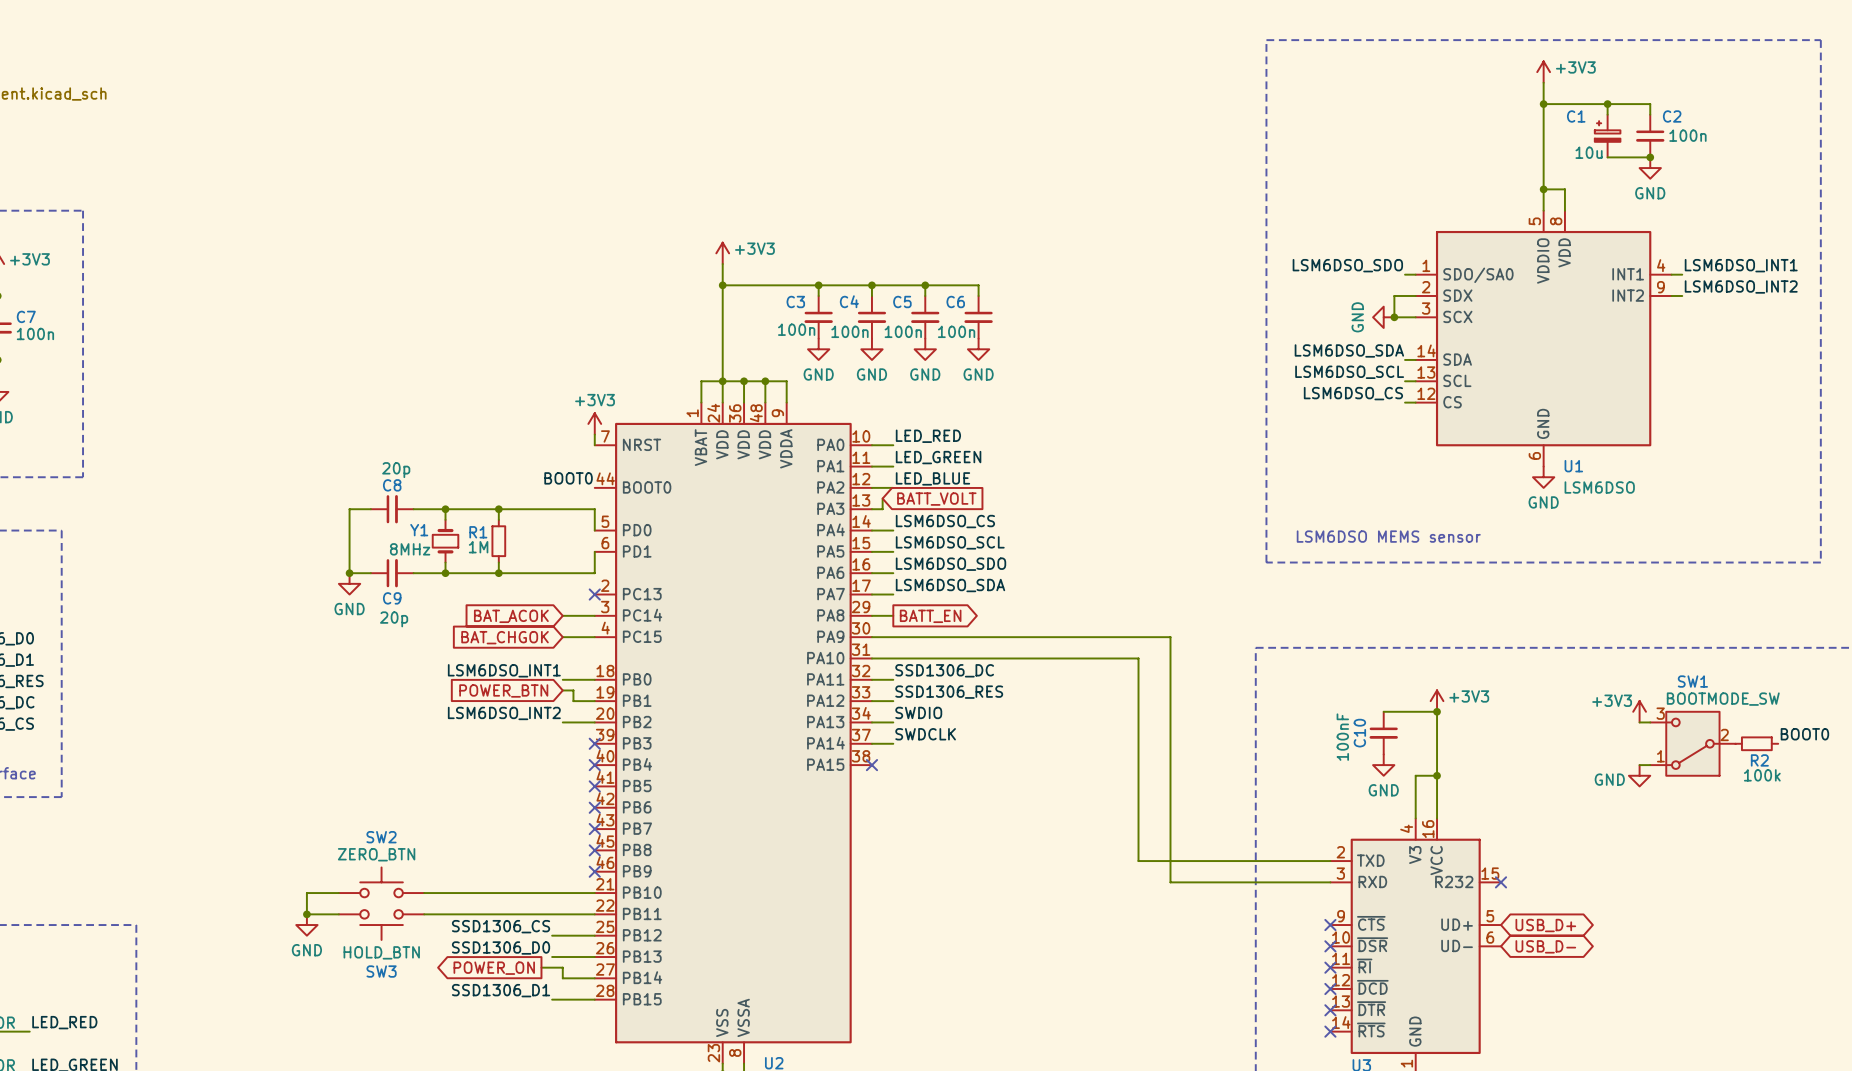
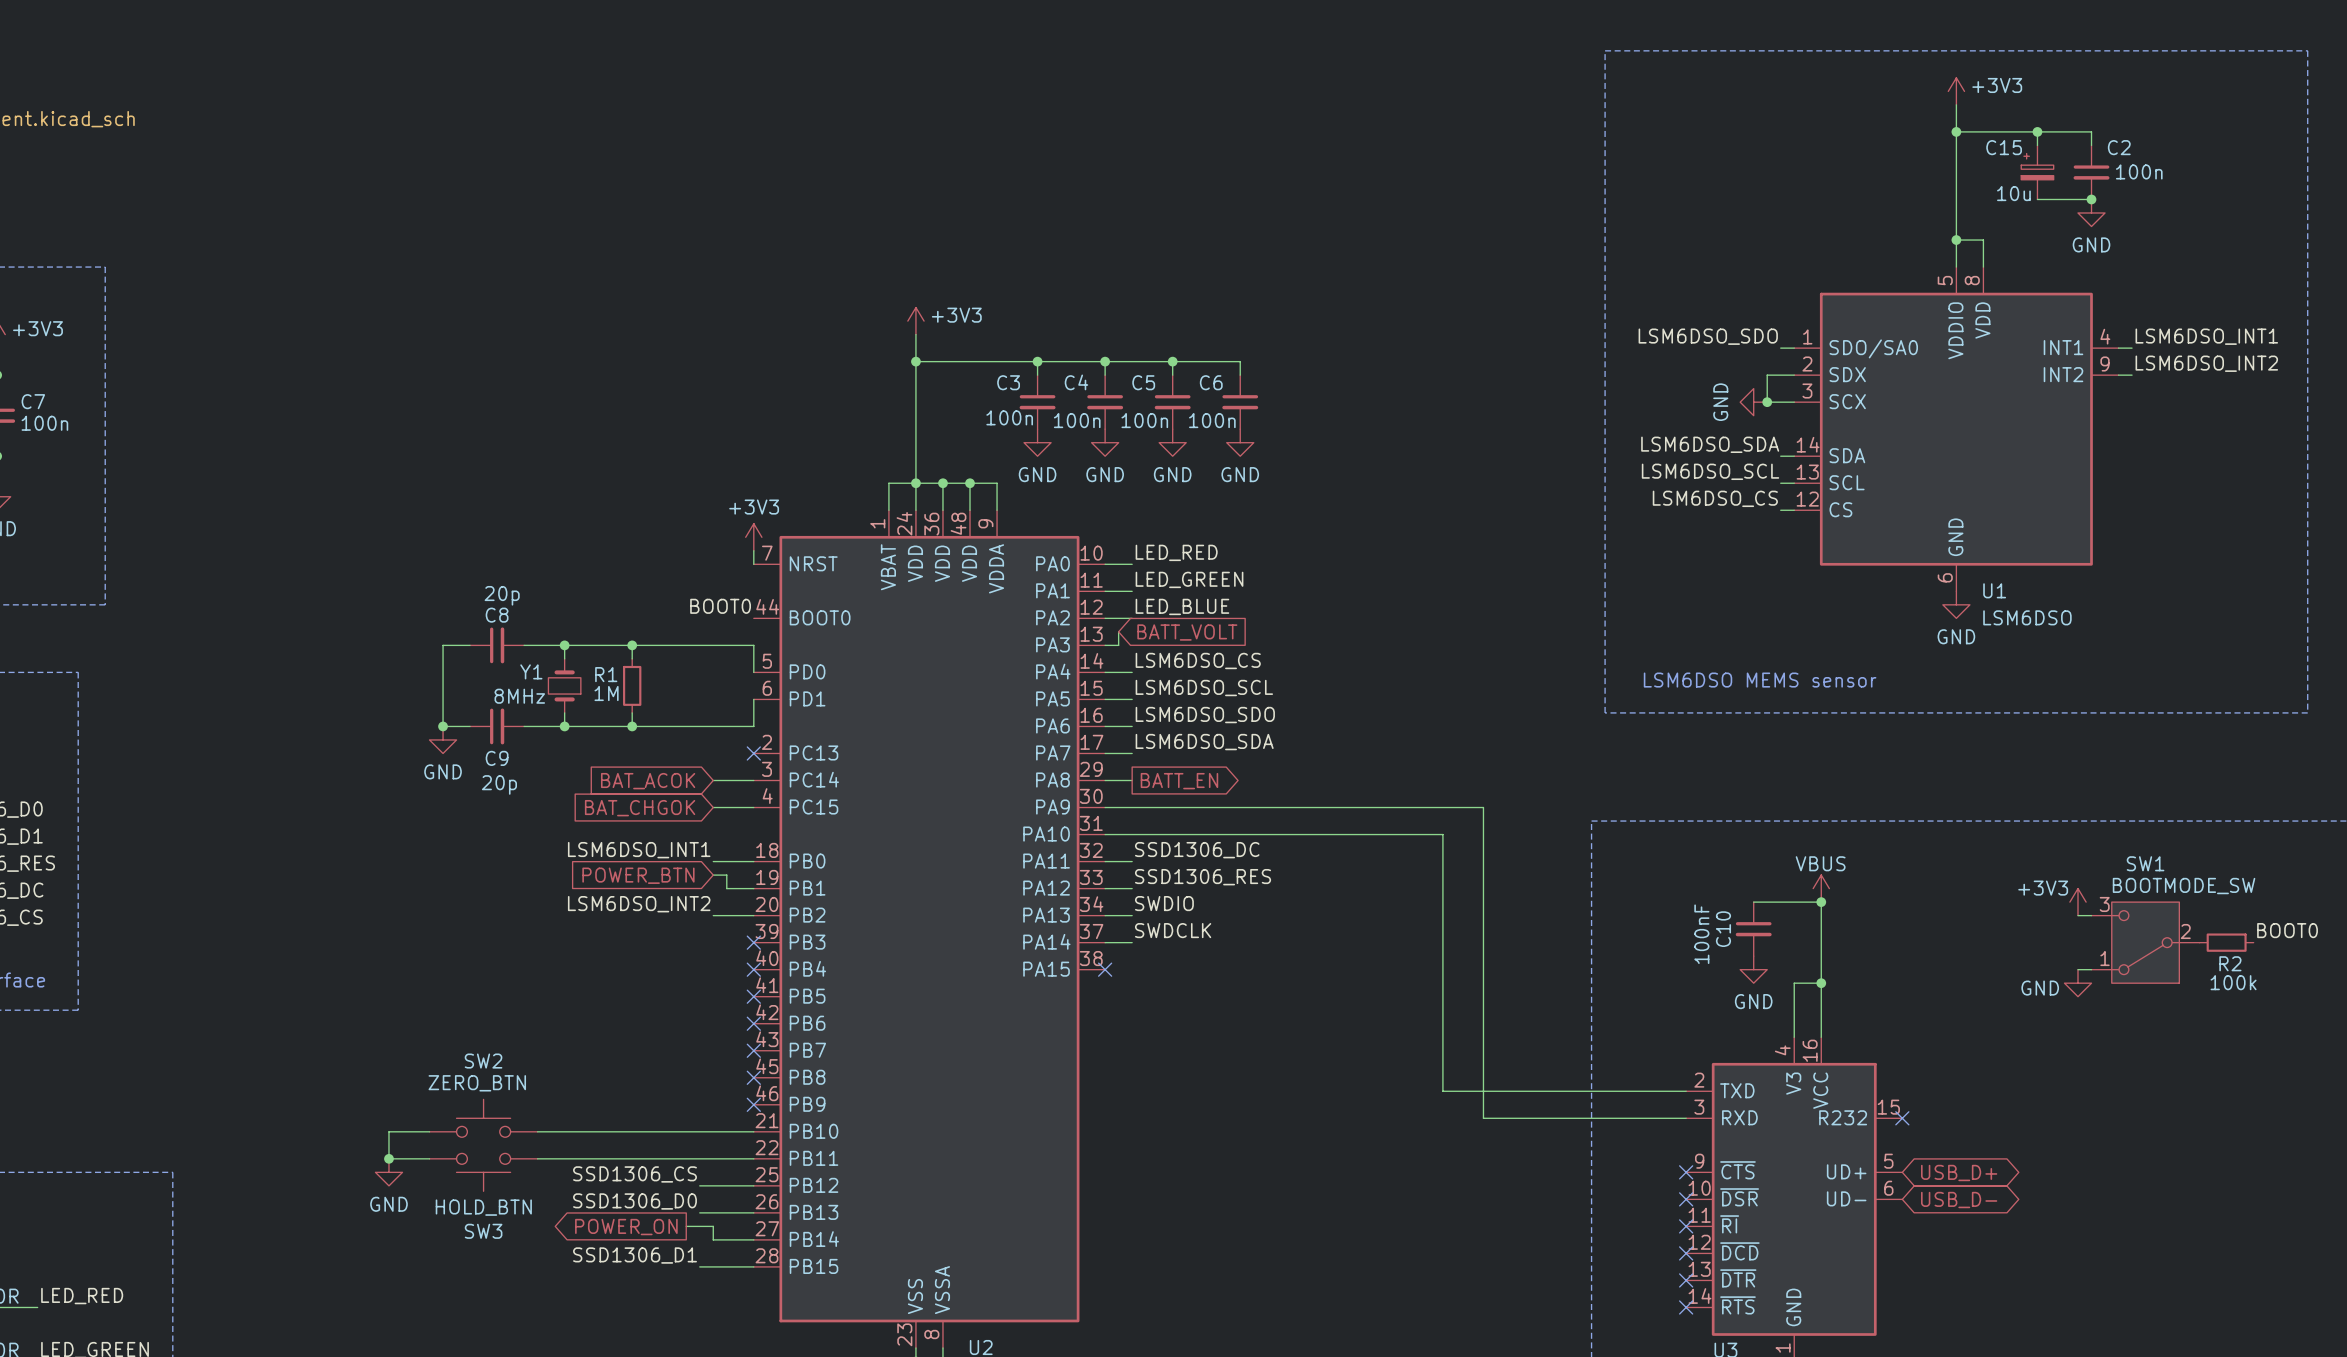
C1 name: C1 (1576, 116) -> C15 (2004, 147)
power symbol: +3V3 (1437, 701) -> VBUS (1821, 888)

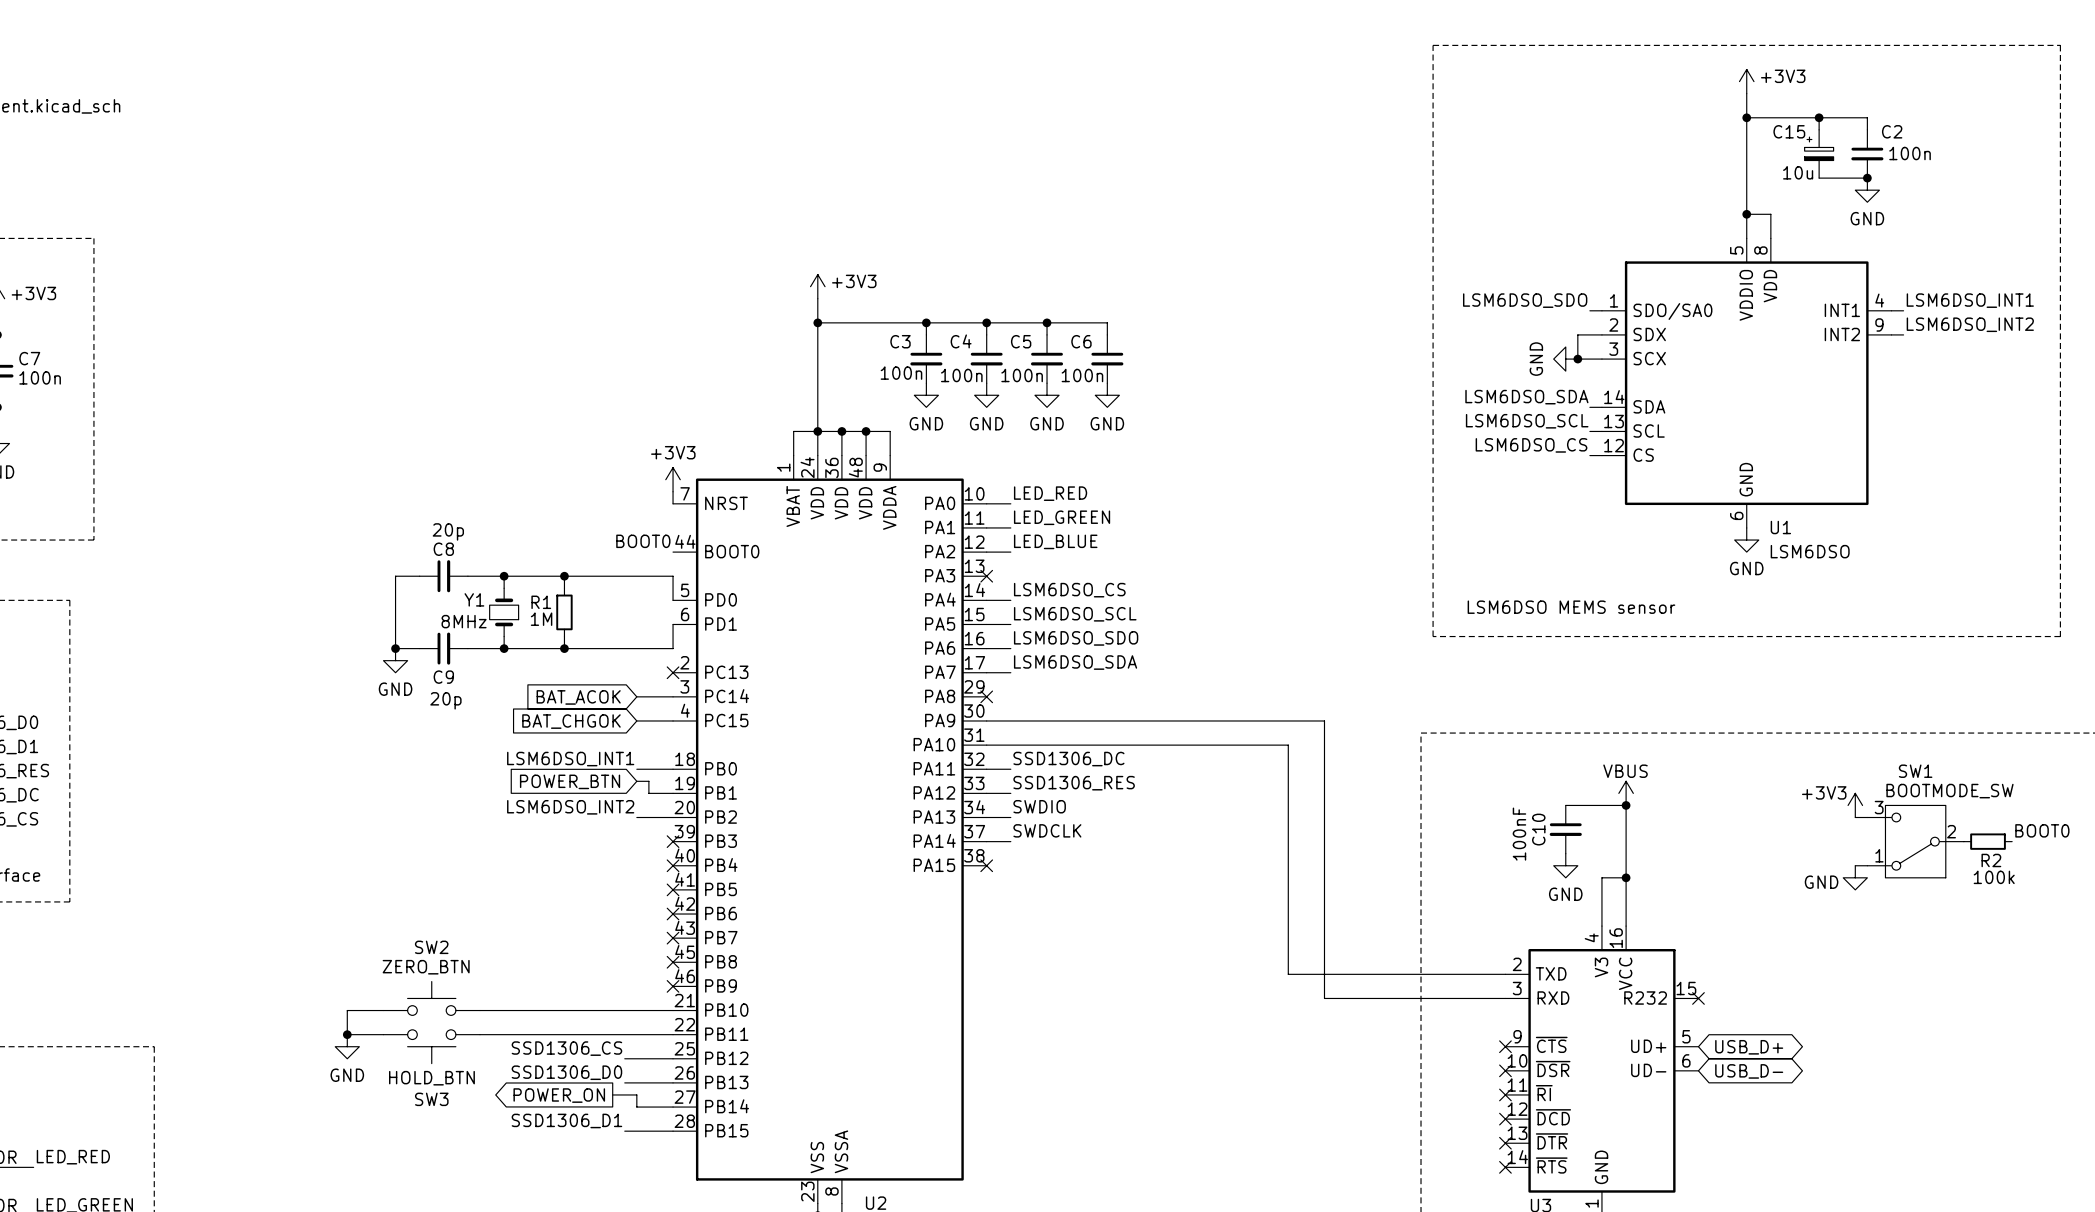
wire: (1118, 631) (1118, 645) (1105, 645) -> none
global label: BATT_VOLT (1187, 632) -> none
no-connect mark: none -> (986, 576)
wire: (1105, 780) (1132, 780) -> none
no-connect mark: none -> (986, 696)
global label: BATT_EN (1179, 781) -> none

